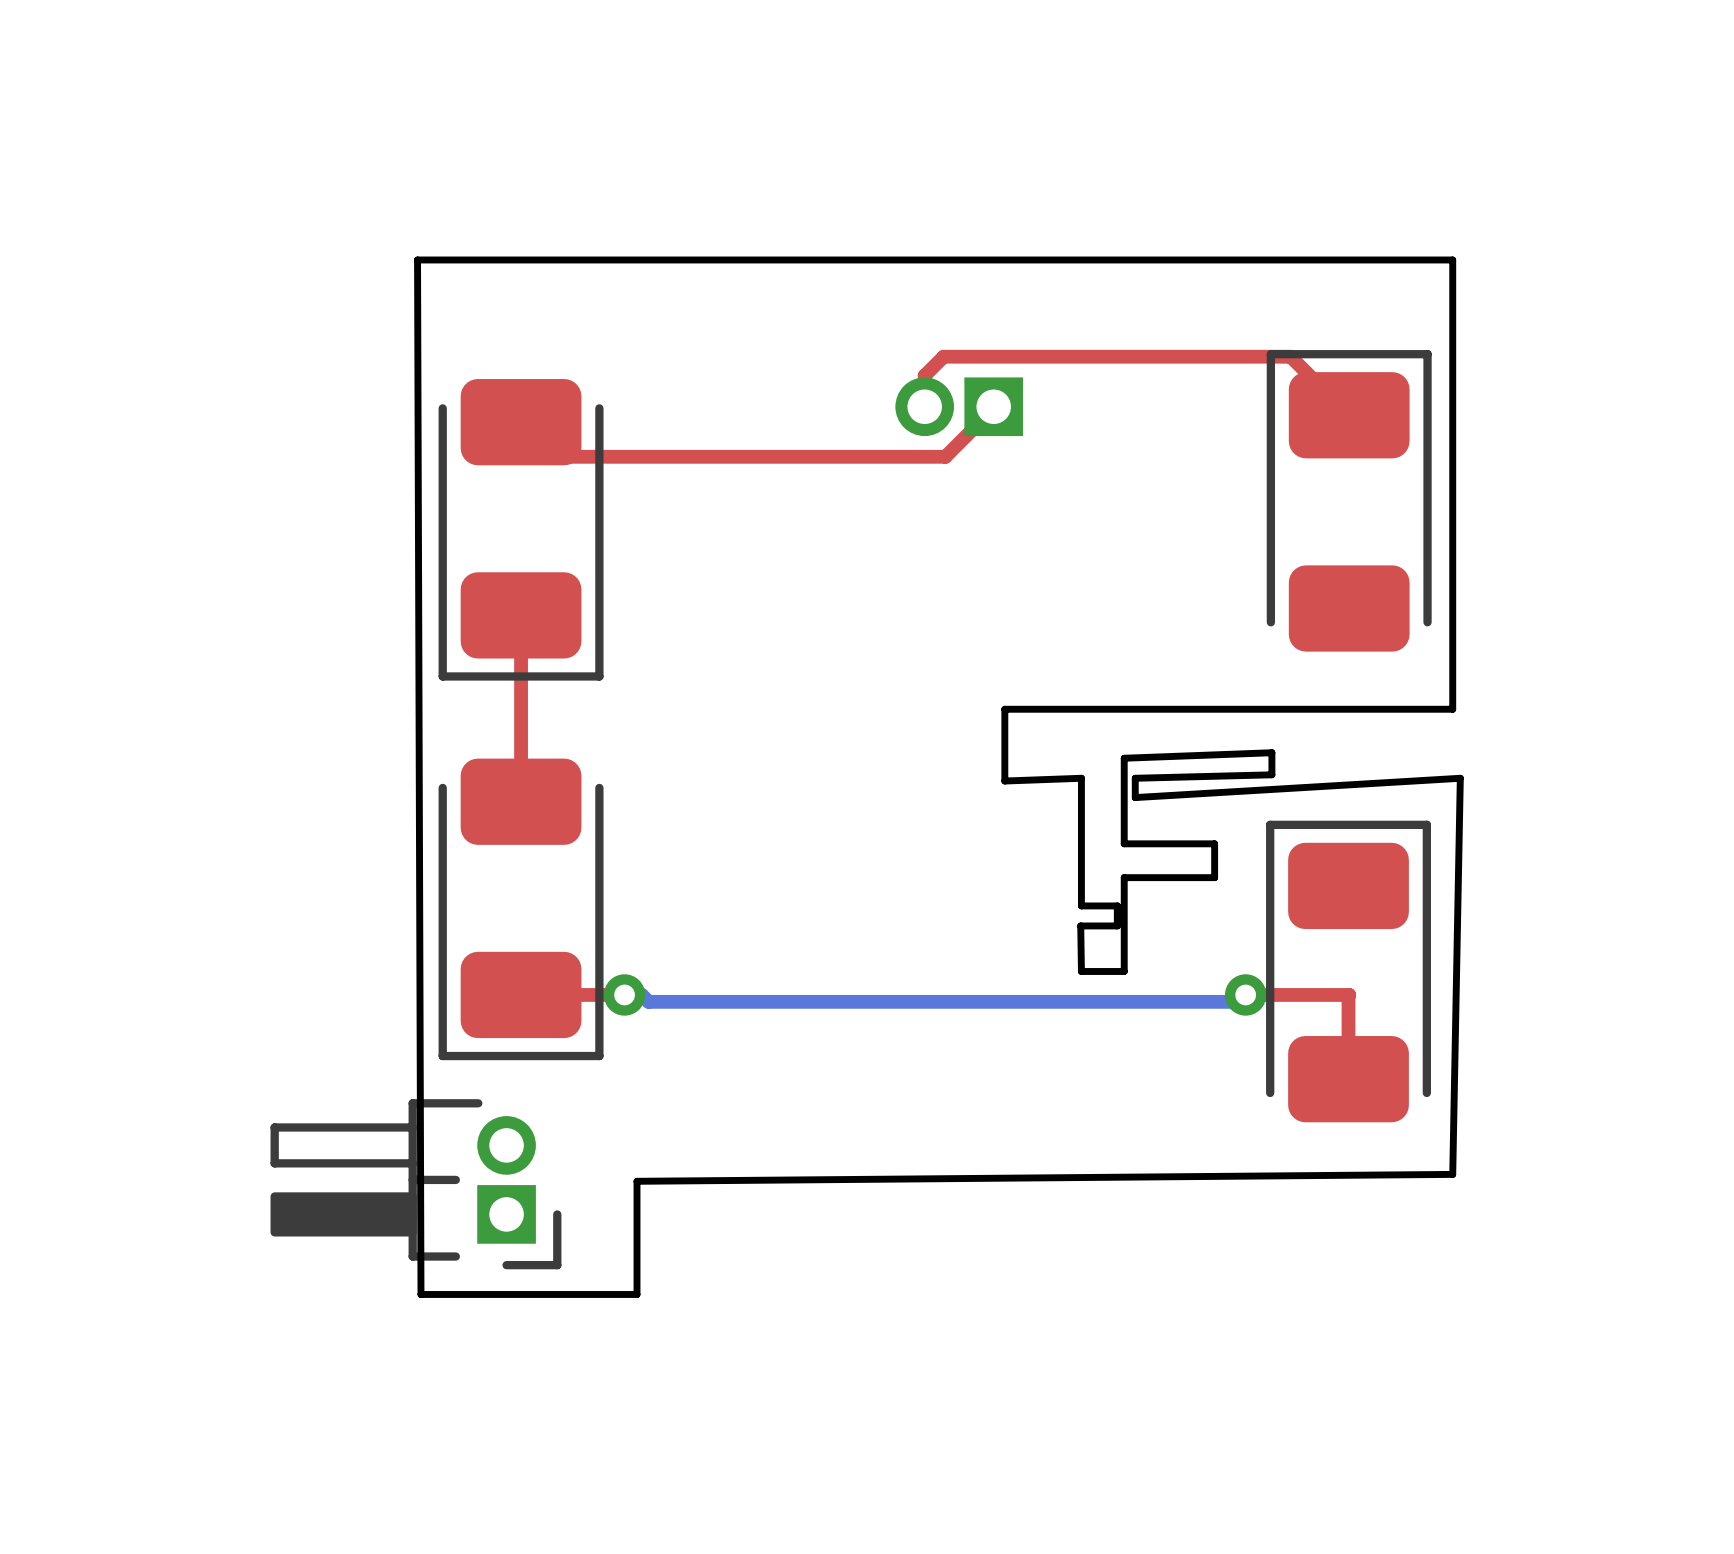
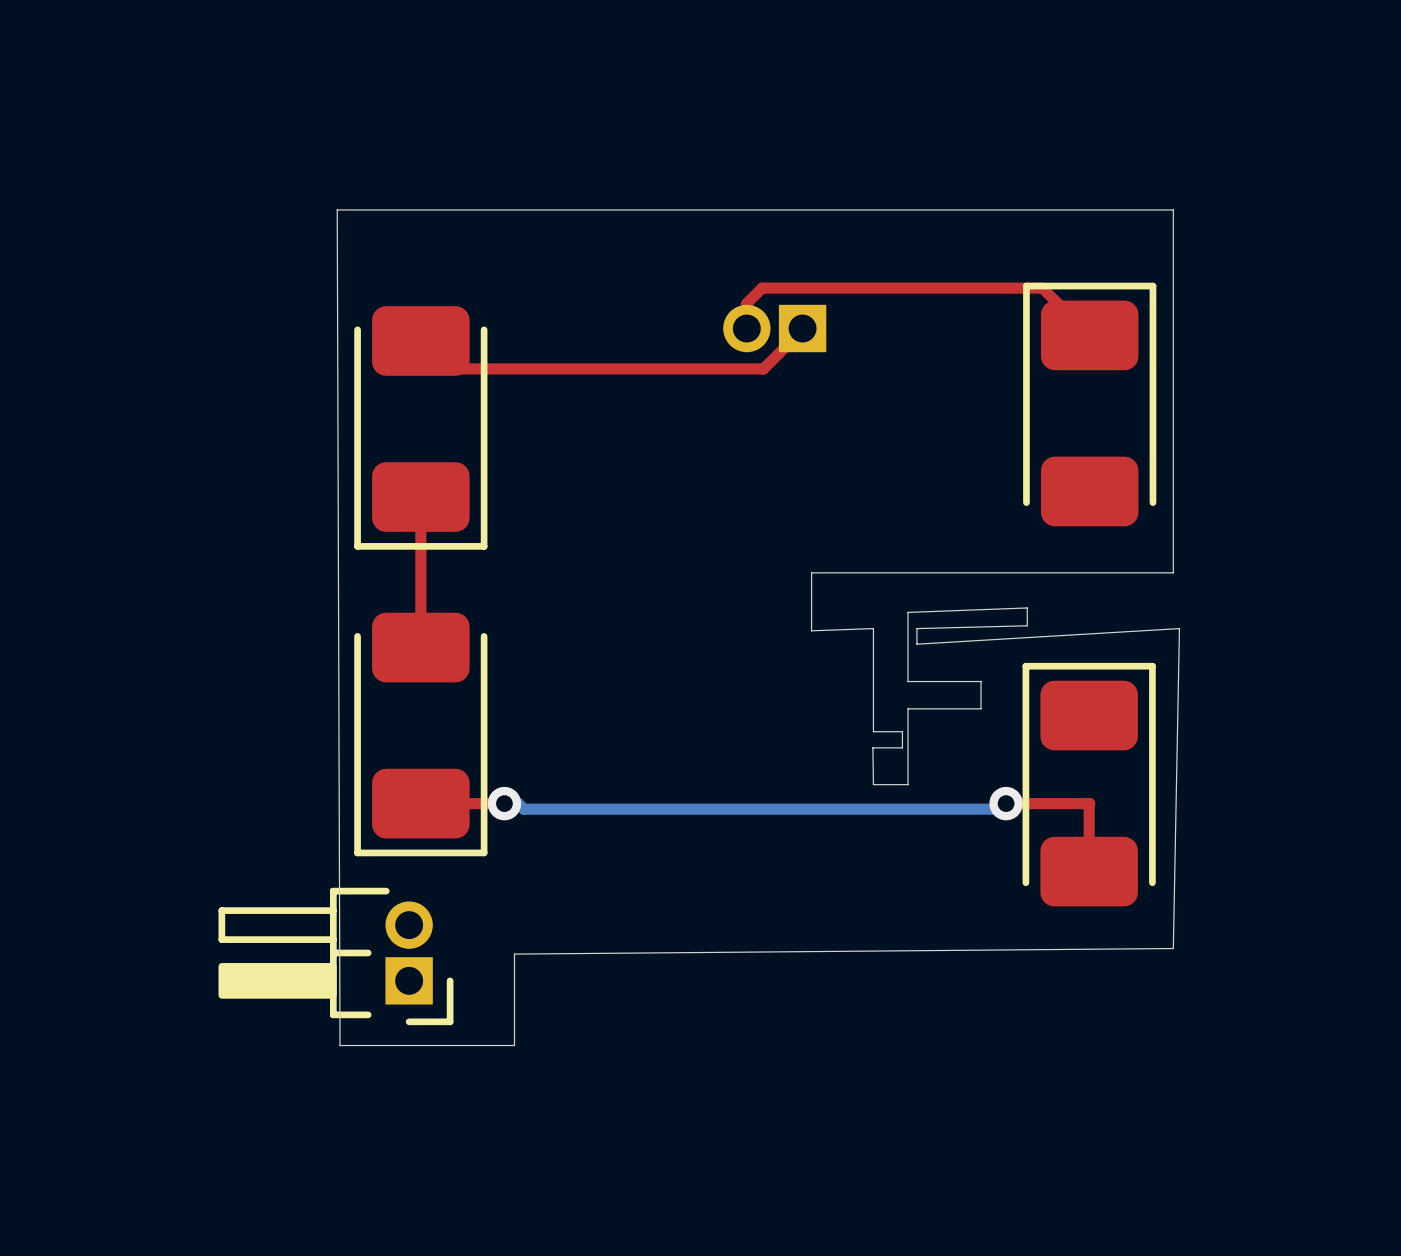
board edge width: thick (417, 259) (1452, 259) (1452, 709) (1004, 709) (1004, 781) (1081, 778) (1081, 905) (1117, 905) (1117, 925) (1080, 925) (1081, 971) (1124, 971) (1124, 877) (1214, 877) (1214, 843) (1124, 843) (1124, 758) (1271, 752) (1271, 774) (1135, 778) (1135, 797) (1460, 778) (1452, 1174) (637, 1181) (637, 1294) (420, 1294) (417, 259) -> thin (337, 209) (1173, 209) (1173, 572) (811, 572) (811, 630) (873, 628) (873, 731) (902, 731) (902, 747) (872, 747) (873, 784) (908, 784) (908, 708) (981, 708) (981, 681) (908, 681) (908, 612) (1027, 607) (1027, 625) (916, 628) (916, 644) (1179, 628) (1173, 948) (514, 954) (514, 1045) (340, 1045) (337, 209)

